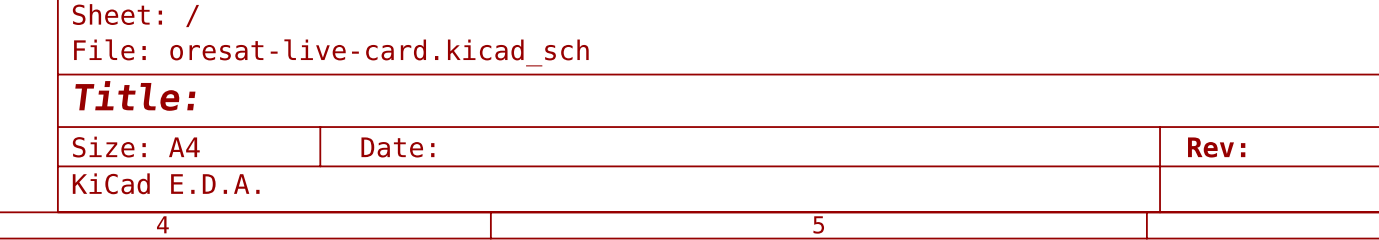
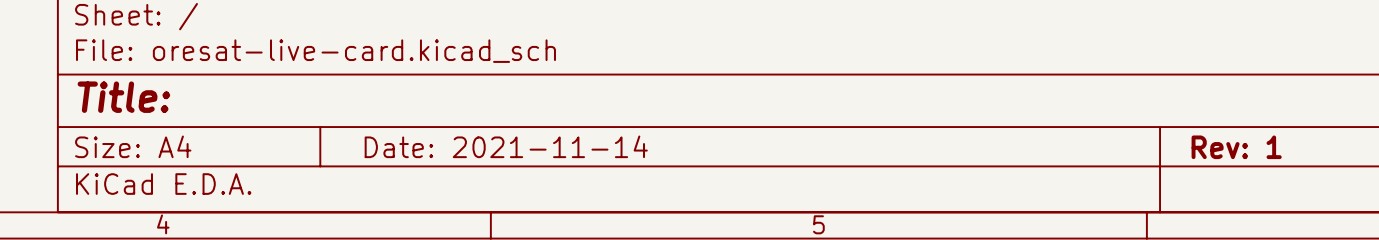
title block: Date: (397, 147) -> Date: 2021-11-14 (506, 146)
title block: Rev: (1216, 147) -> Rev: 1 (1236, 147)

